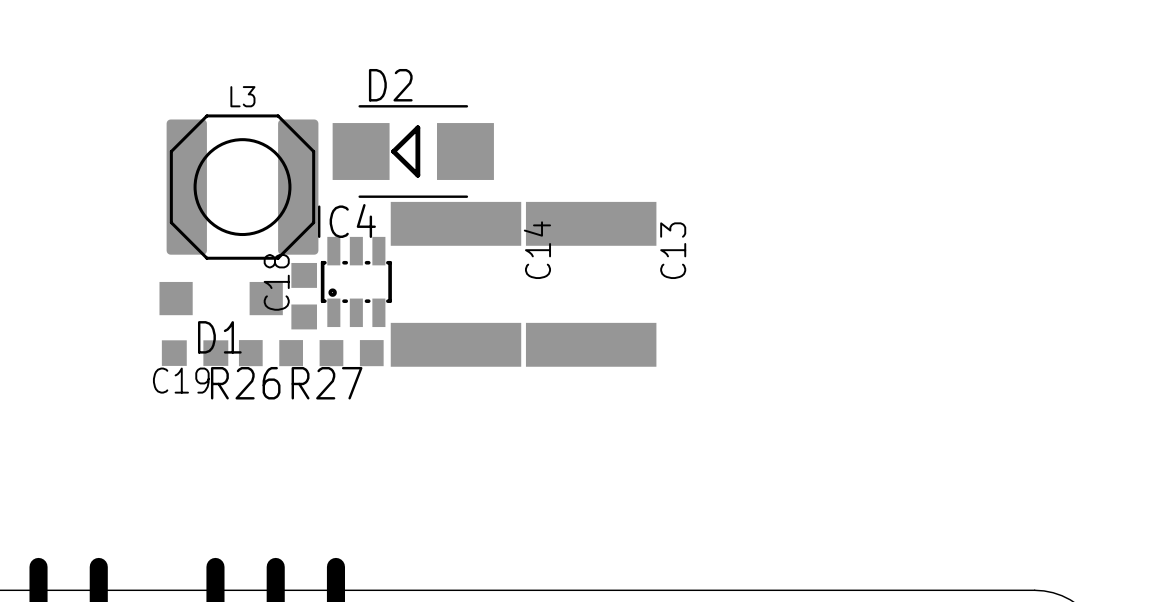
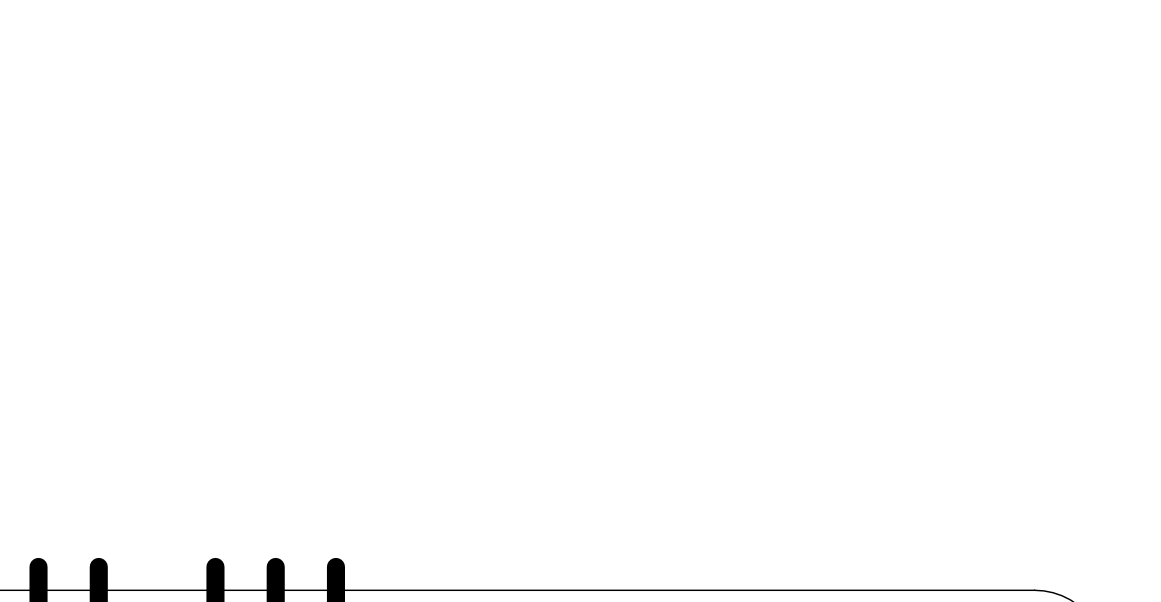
D2: (413, 151) -> none
L3: (242, 187) -> none
IC4: (356, 281) -> none
C14: (455, 284) -> none
C13: (591, 284) -> none
C18: (304, 296) -> none
D1: (221, 298) -> none
C19: (195, 353) -> none
R26: (270, 353) -> none
R27: (351, 353) -> none

